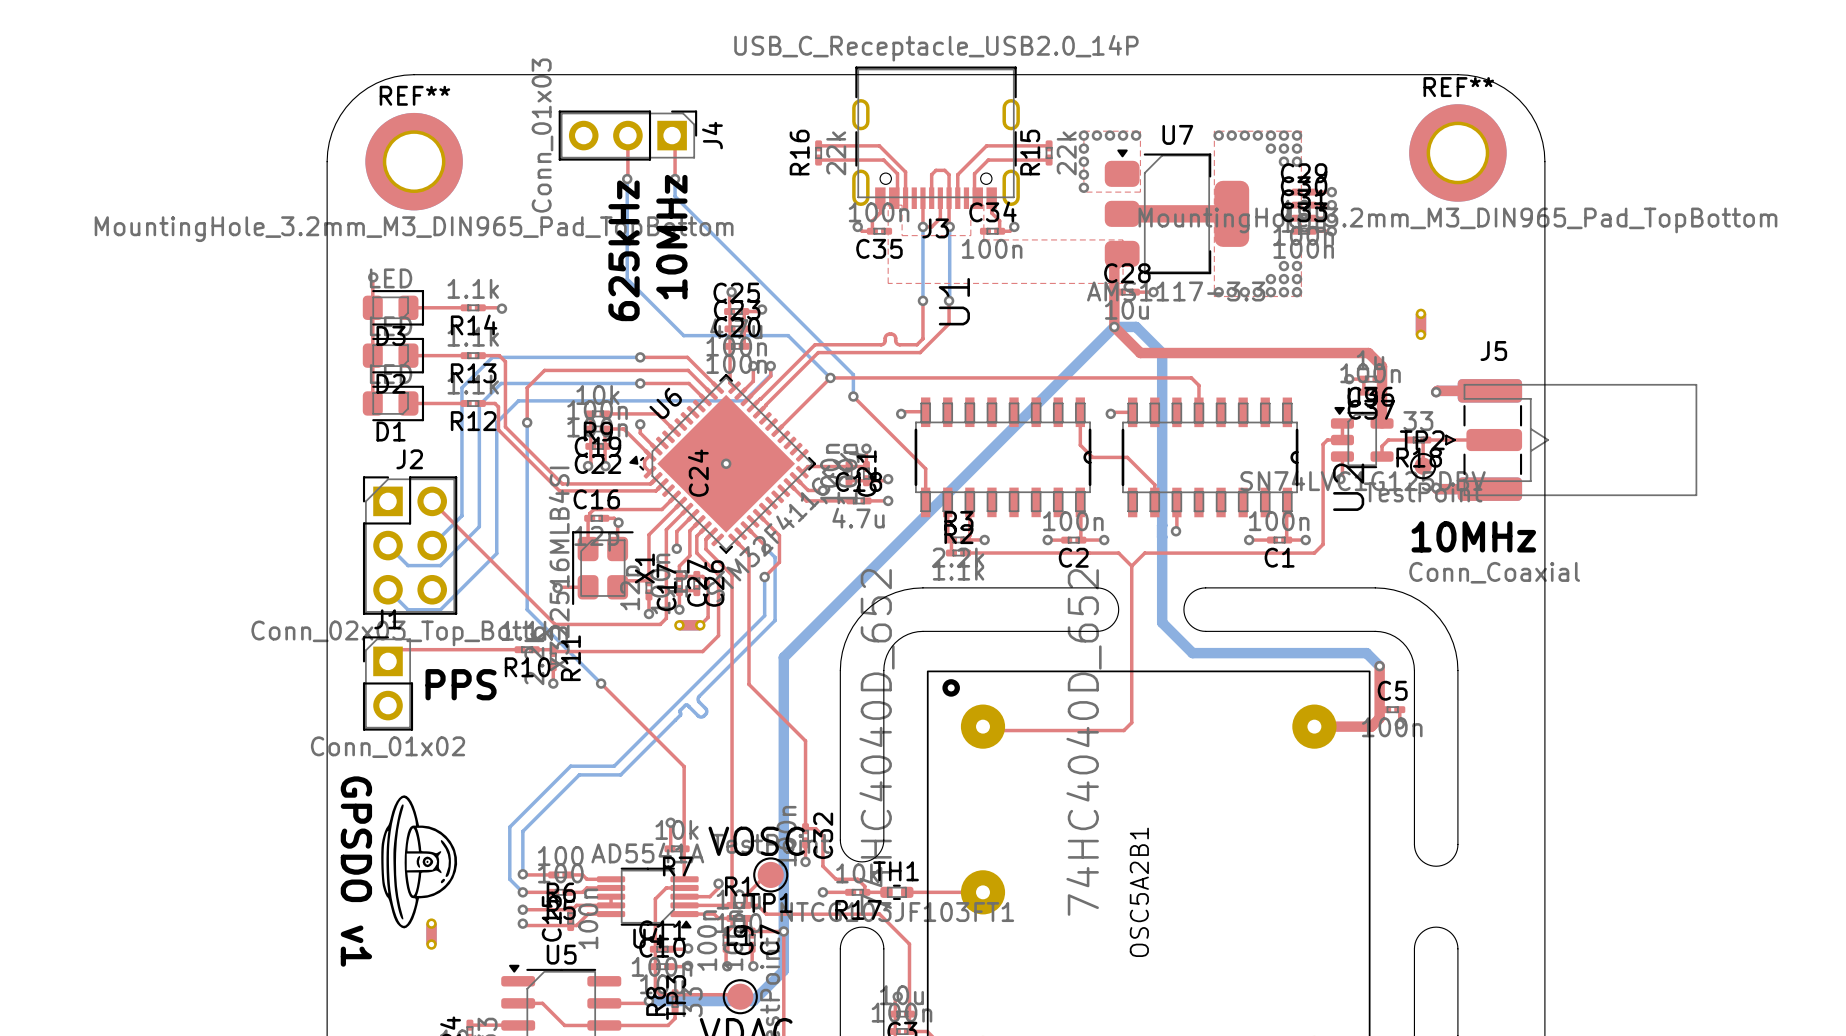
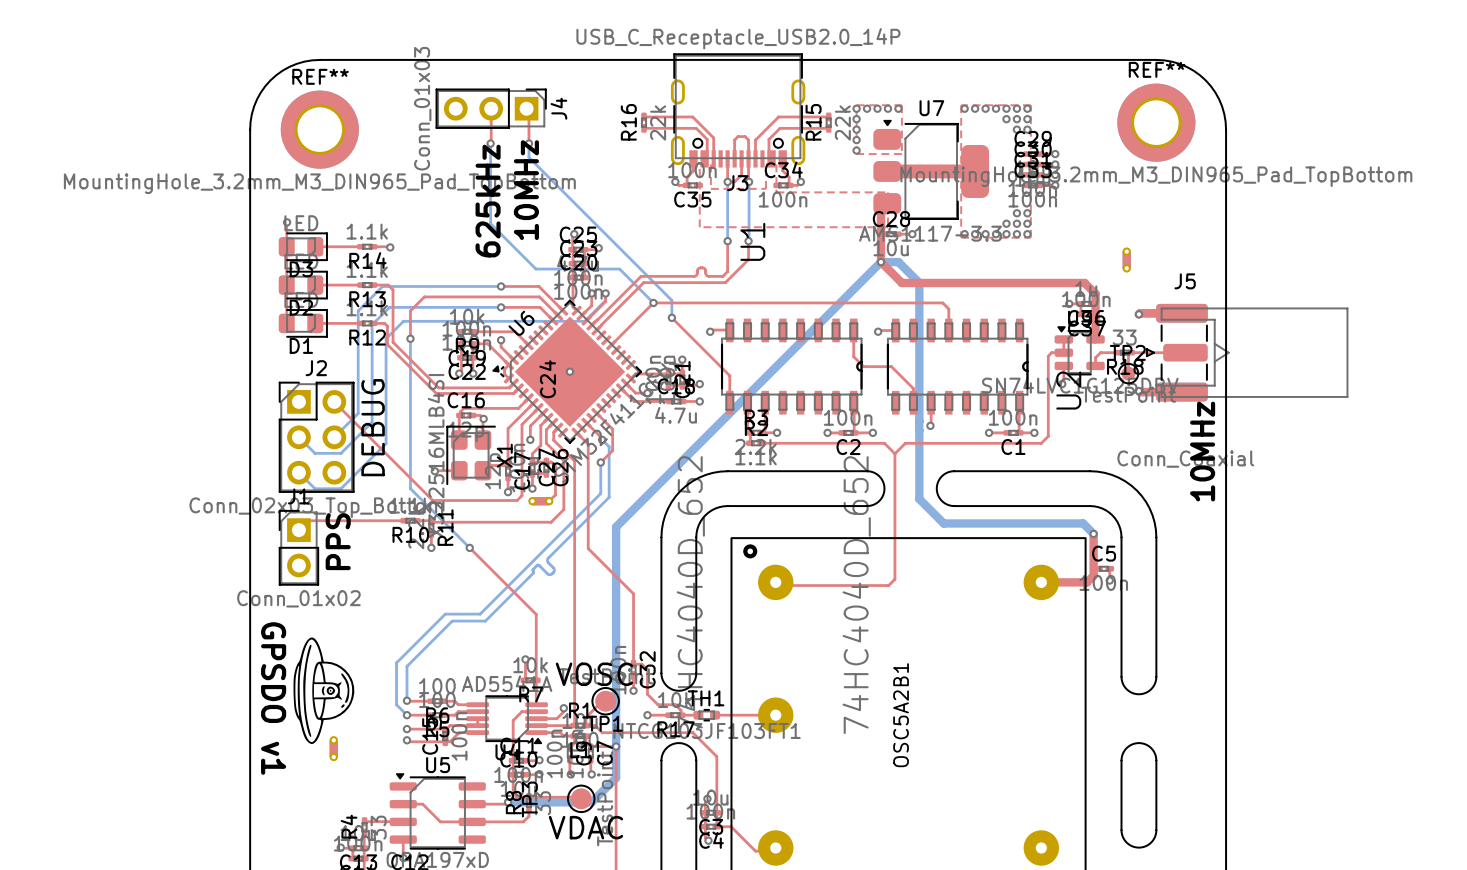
text: none -> DEBUG (373, 427)
text rotation: 0° (1473, 536) -> 90° counterclockwise (1202, 451)
text rotation: 0° (461, 684) -> 90° counterclockwise (338, 541)

